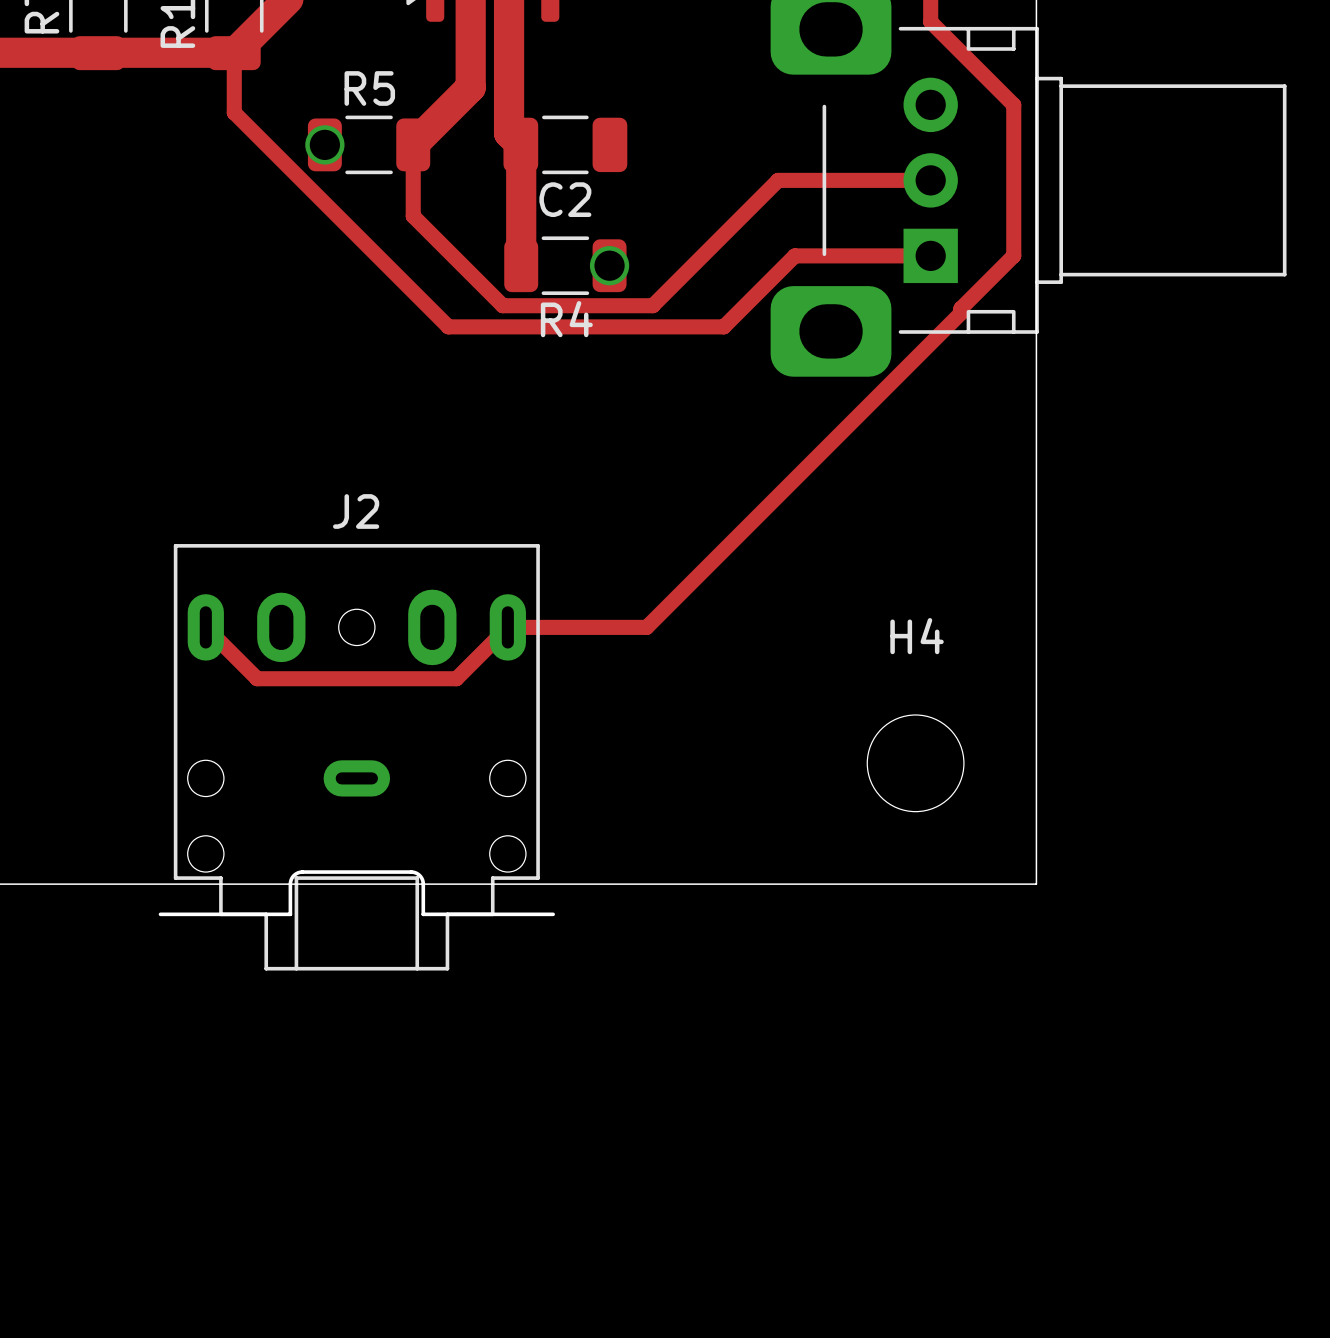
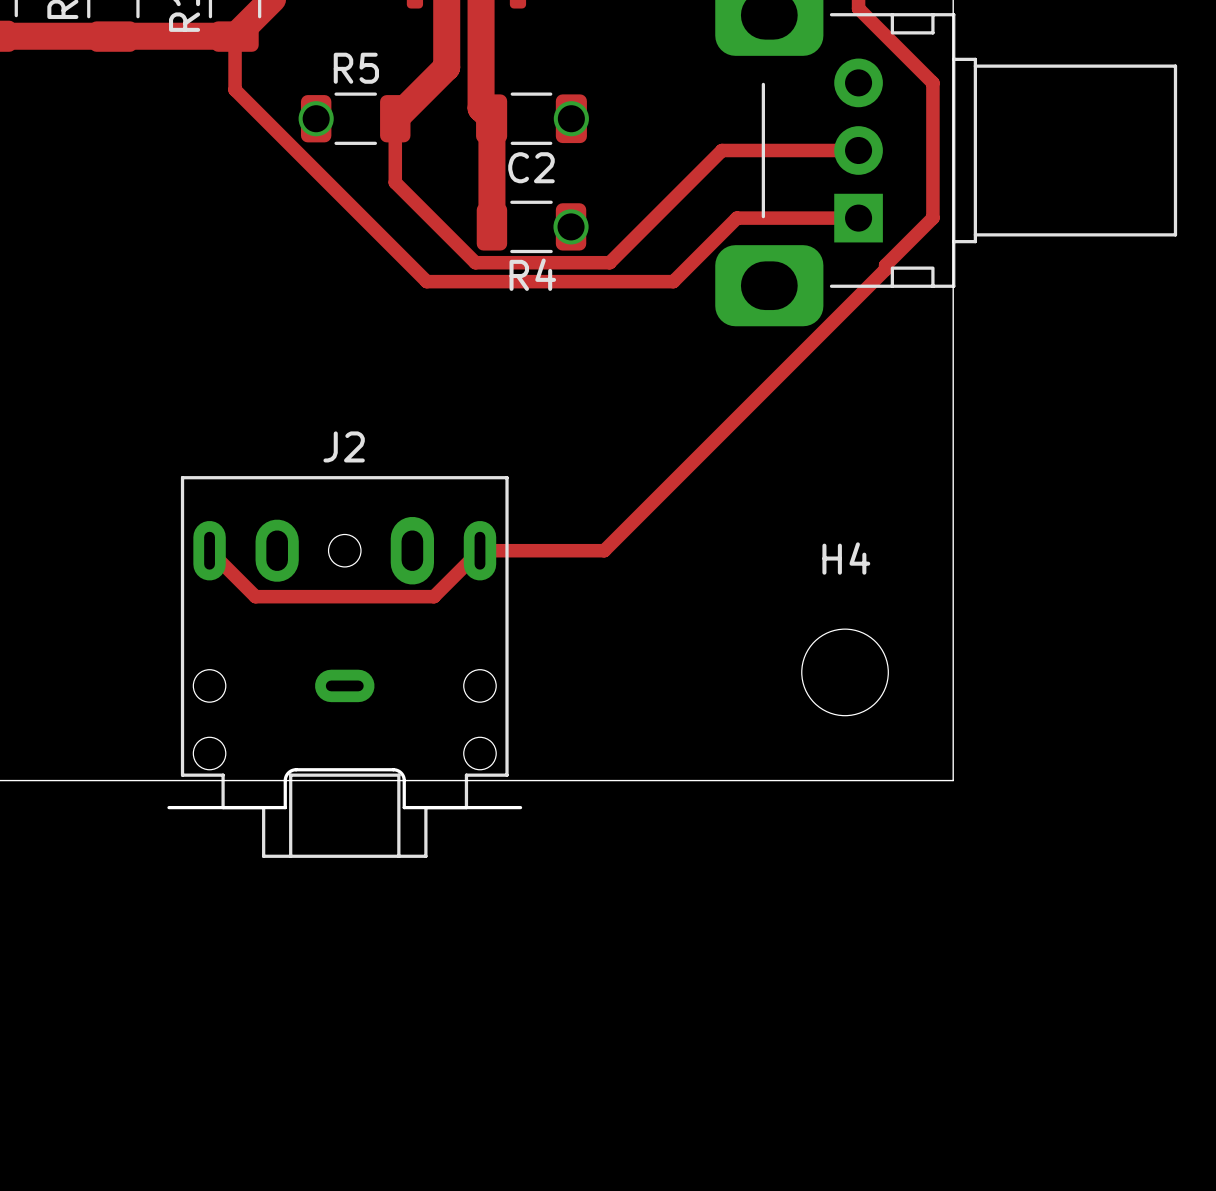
via: none -> (571, 118)

